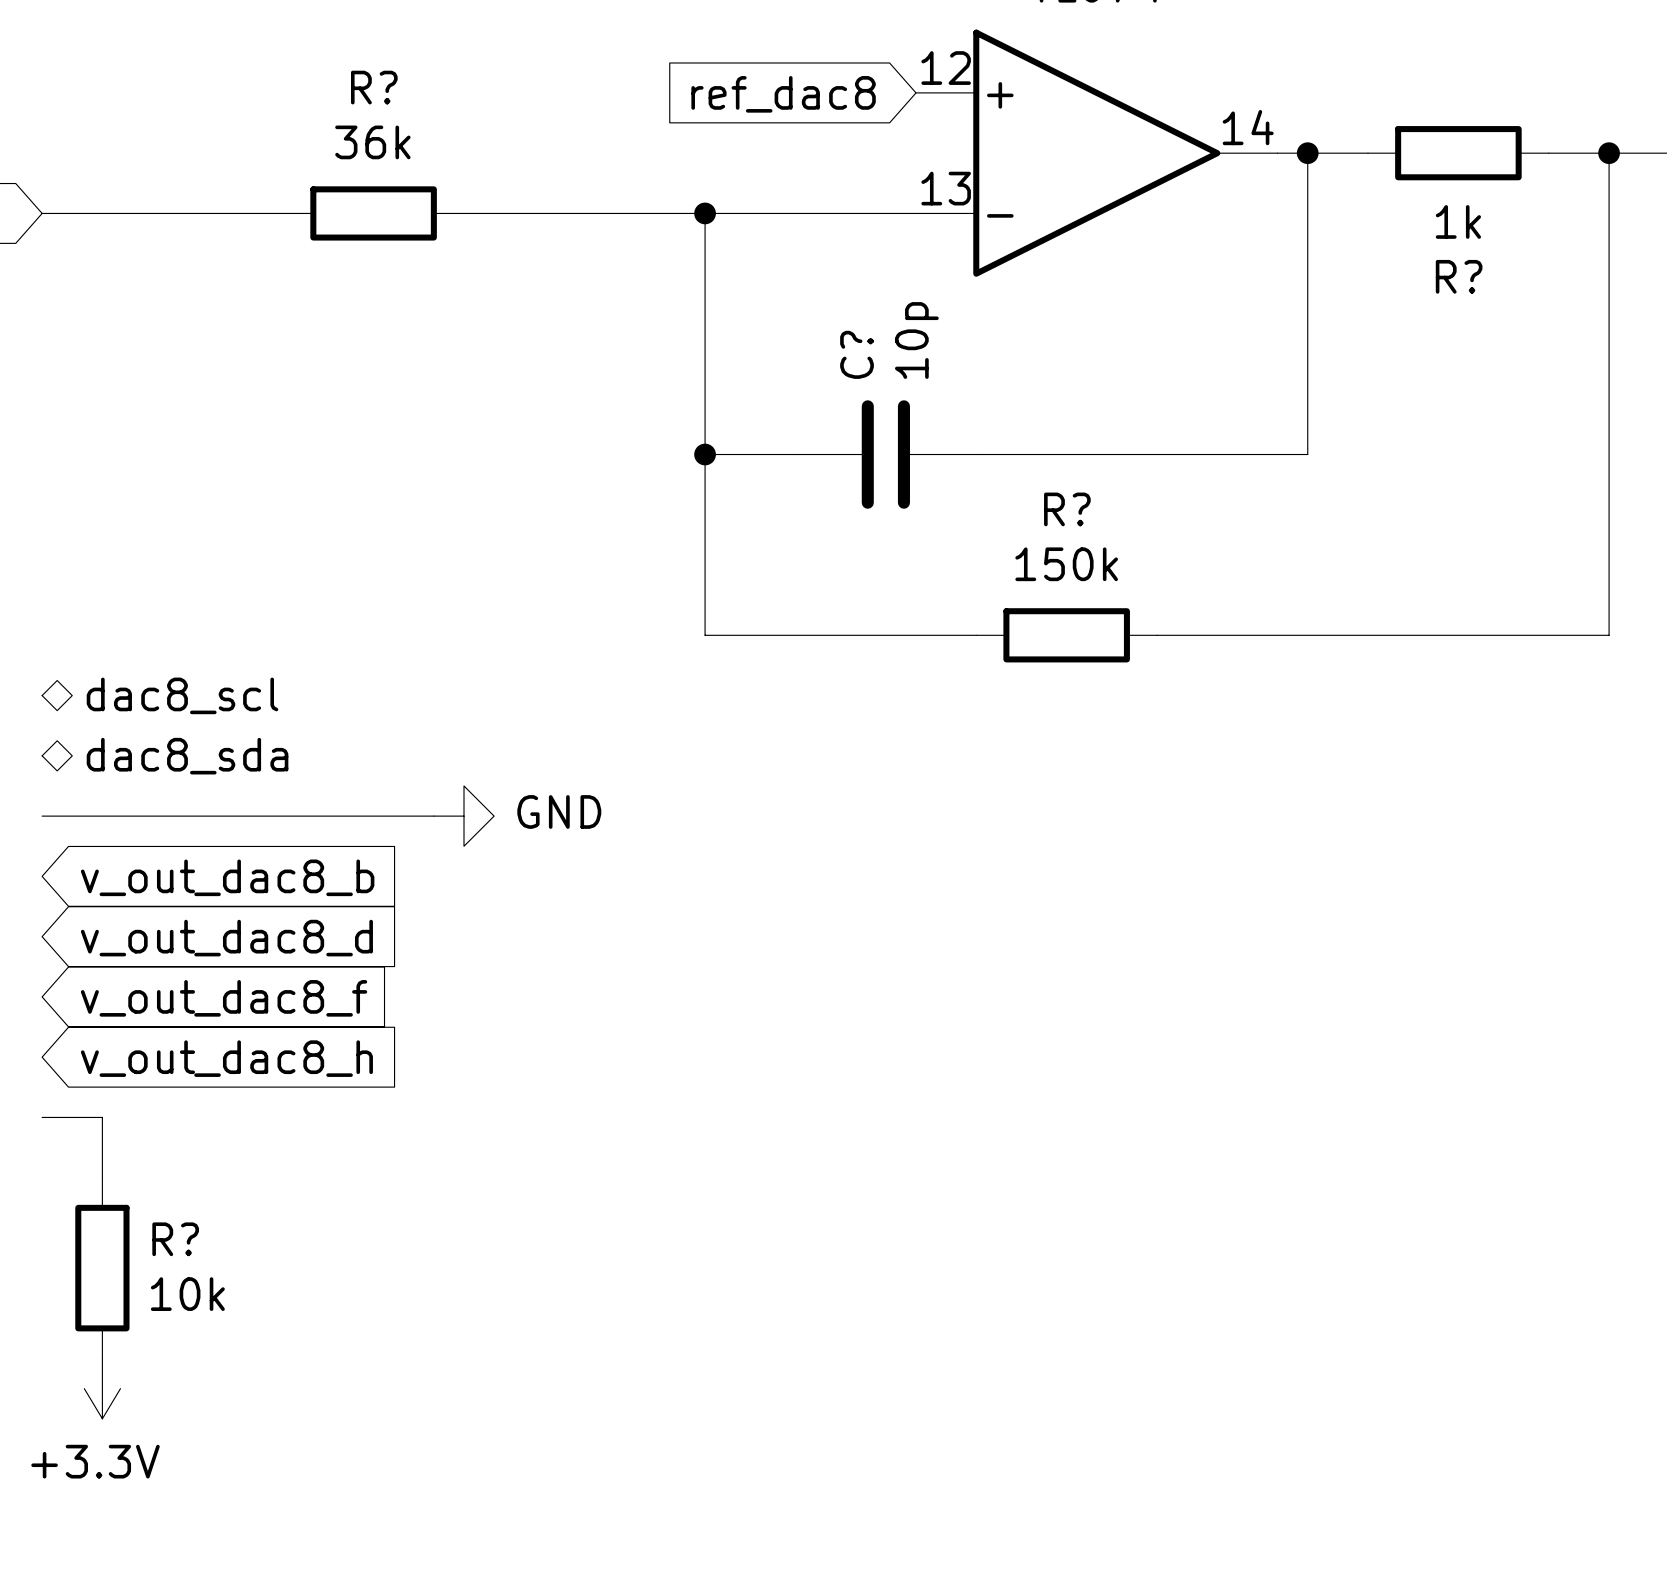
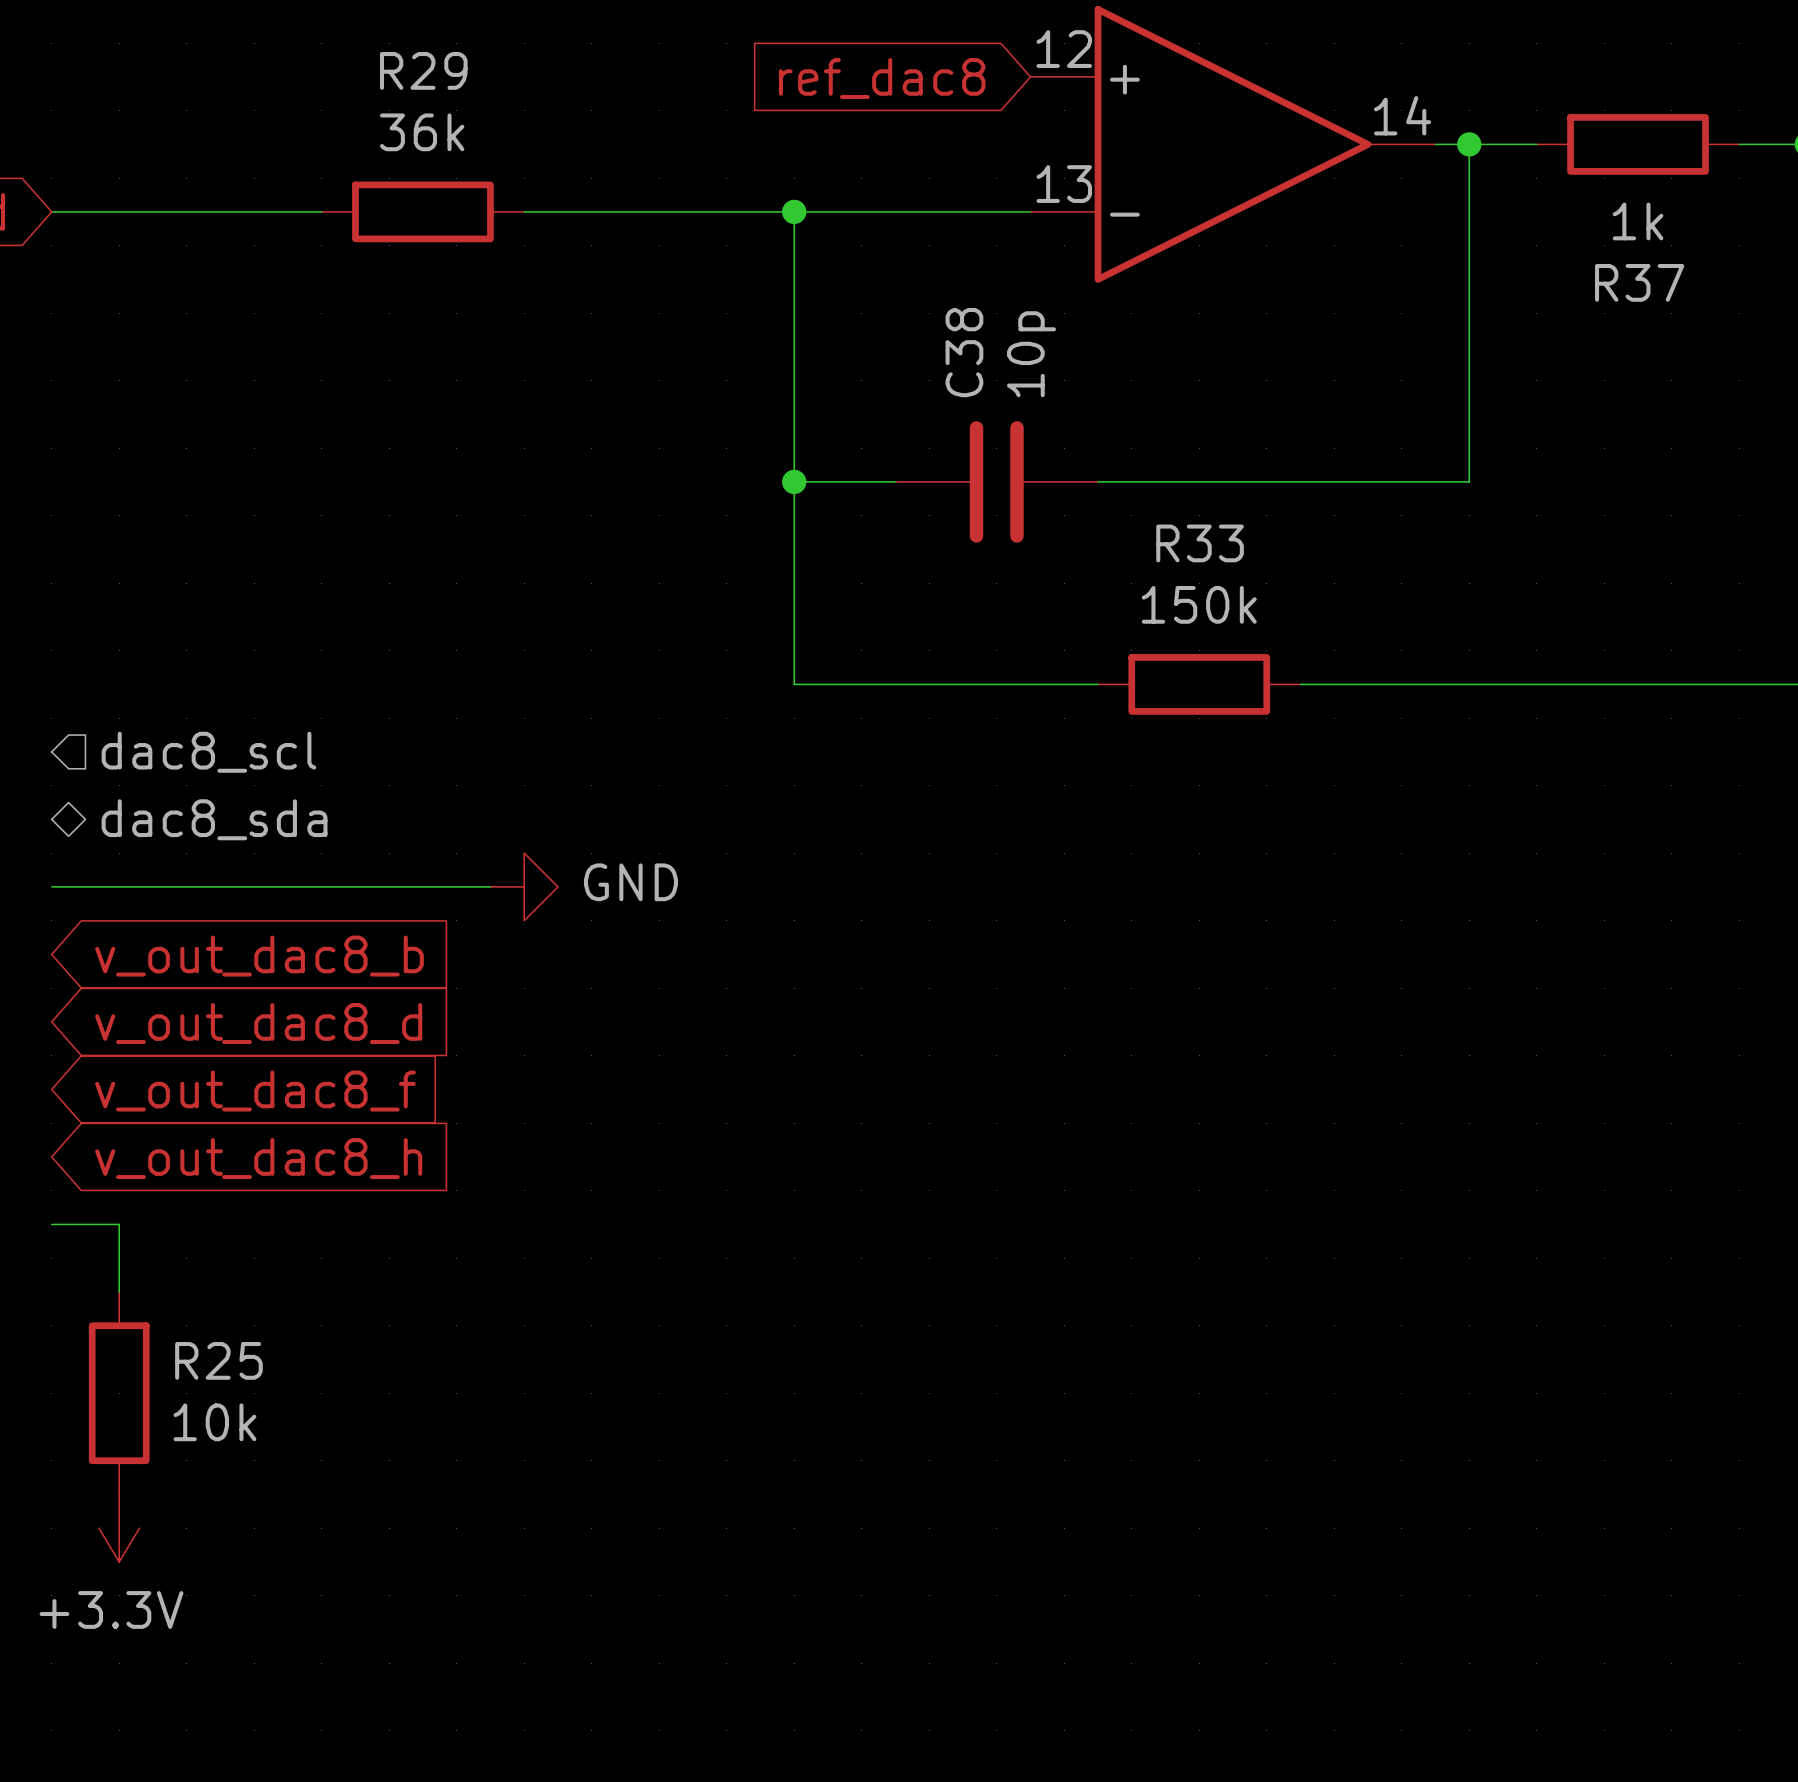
R? name: R? (374, 87) -> R29 (423, 70)
R? name: R? (1459, 276) -> R37 (1639, 282)
C? name: C? (857, 354) -> C38 (964, 352)
R? name: R? (1067, 509) -> R33 (1200, 543)
hierarchical label shape: bidirectional (182, 695) -> input (208, 752)
R? name: R? (175, 1239) -> R25 (218, 1360)

